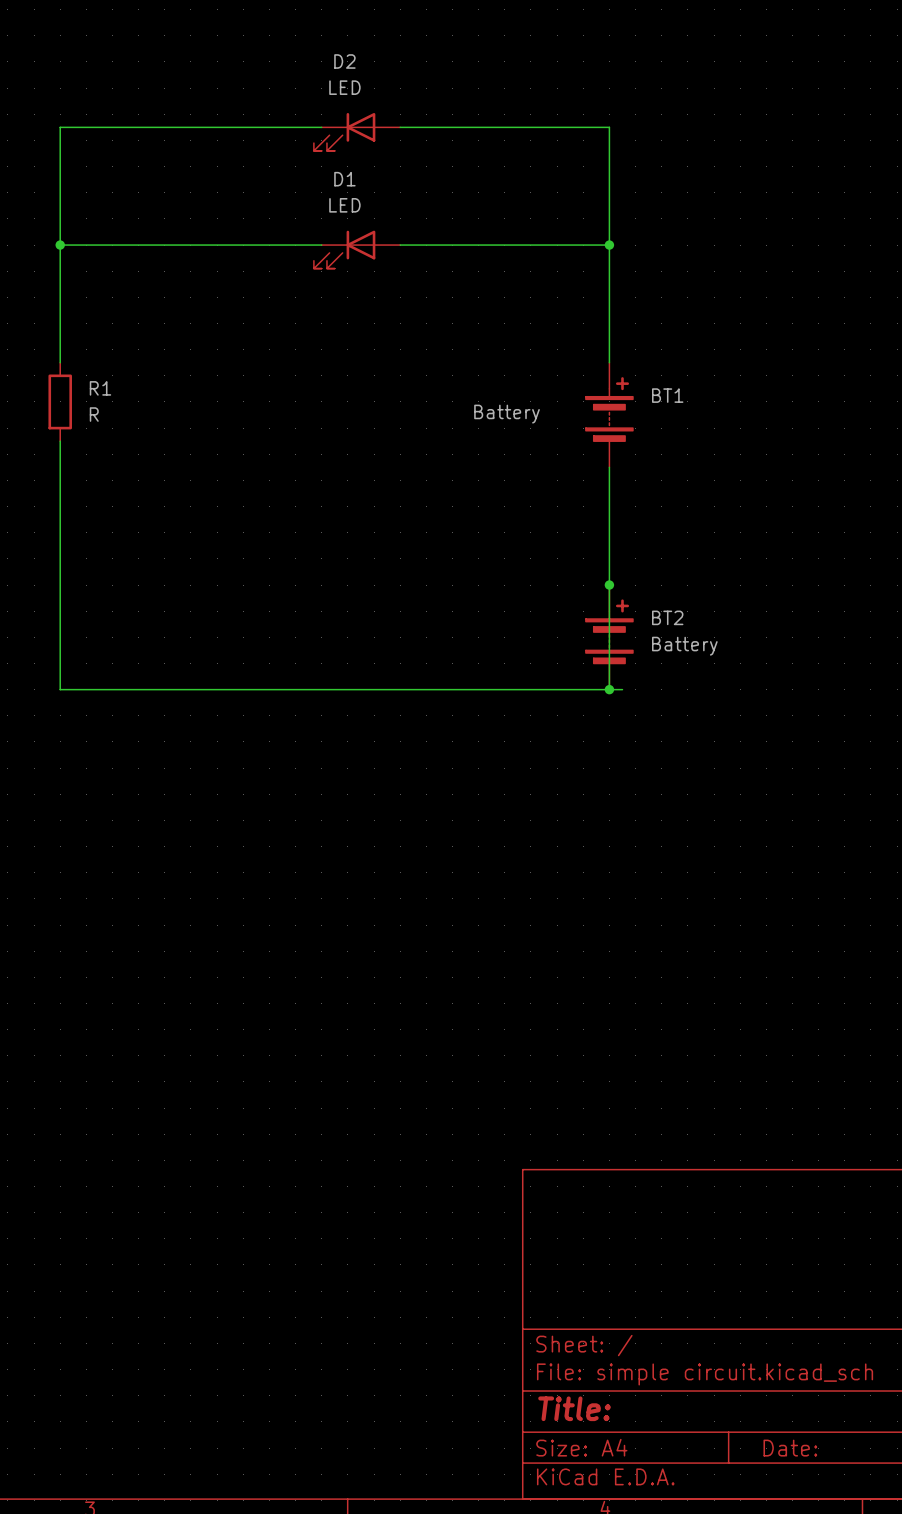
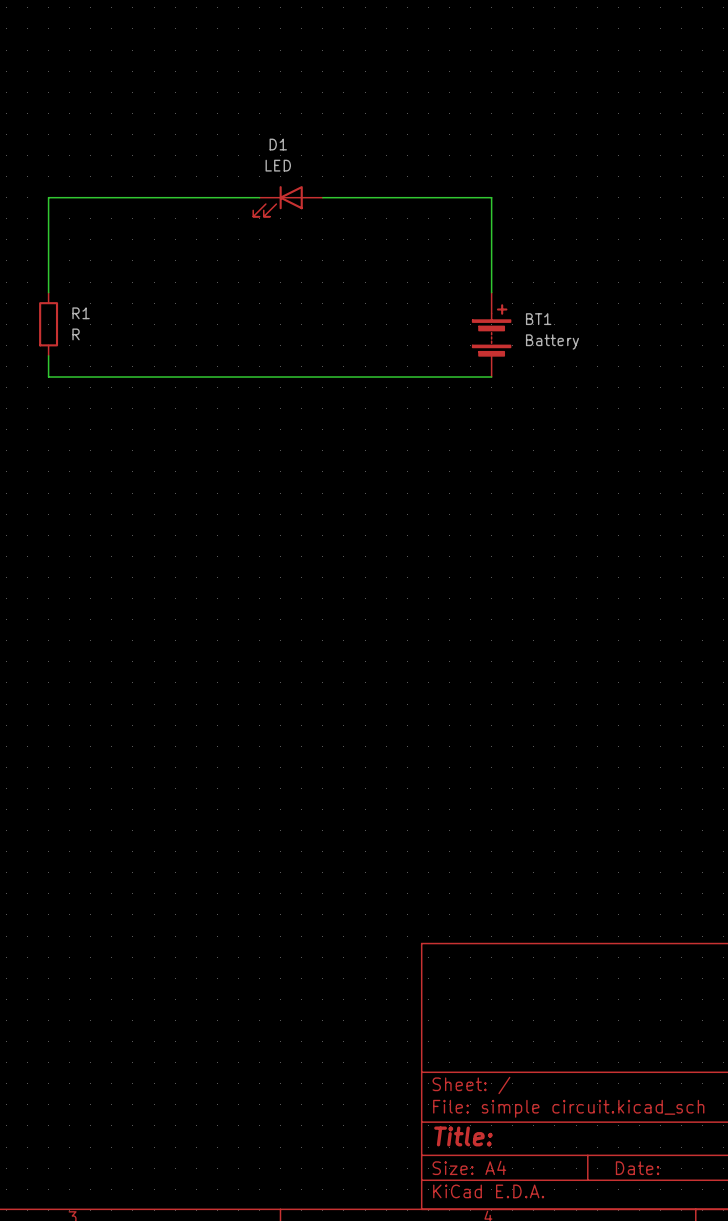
wire: (321, 127) (60, 127) (60, 245) -> none
wire: (400, 127) (609, 127) (609, 245) -> none
D2: LED (357, 131) -> none
junction: (60, 245) -> none
junction: (609, 245) -> none
BT1 value position: Battery (507, 414) -> Battery (552, 341)
wire: (60, 467) (60, 689) (622, 689) -> (48, 377) (491, 377)
wire: (609, 467) (609, 689) -> none
junction: (609, 585) -> none
BT2: Battery (609, 637) -> none
junction: (609, 689) -> none

